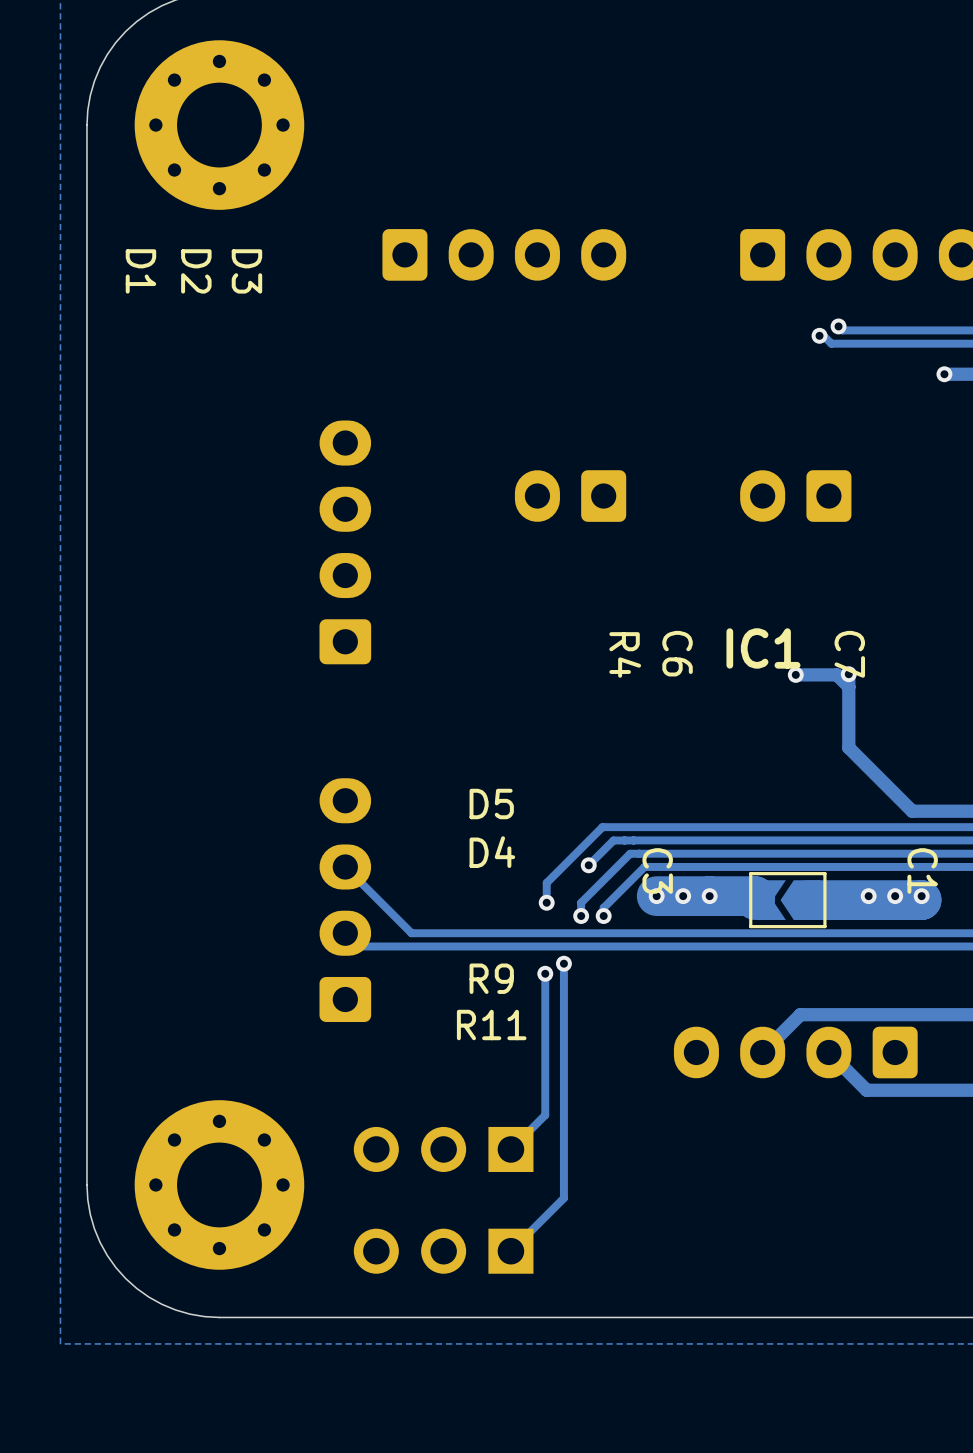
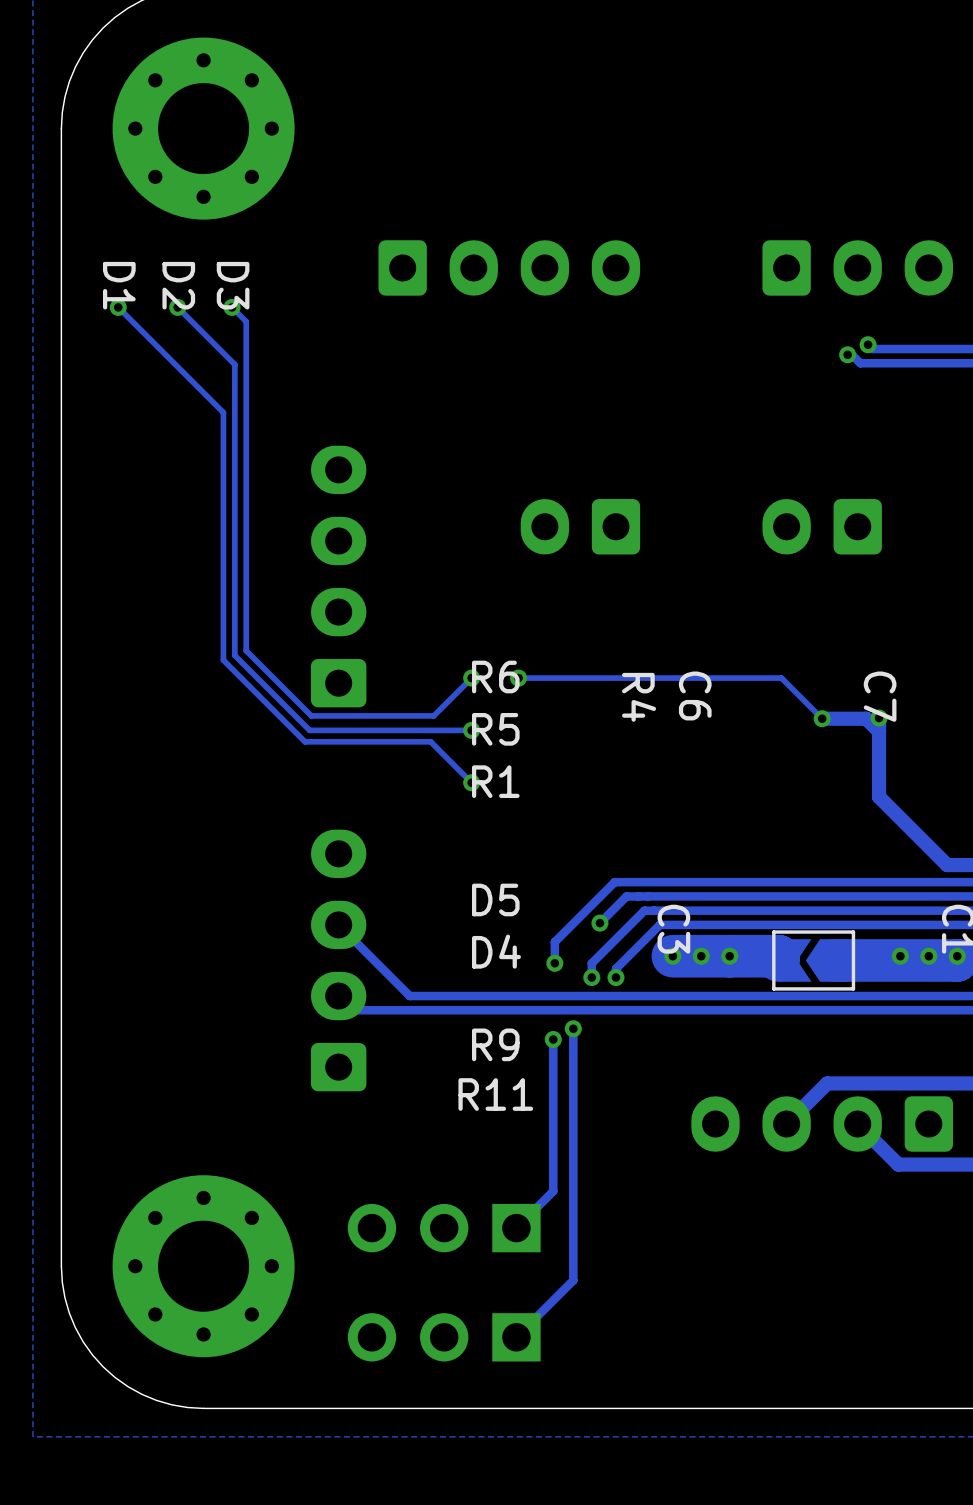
track: none -> (118, 307) (223, 412) (223, 660) (305, 741) (430, 741) (471, 782)
via: none -> (118, 307)
track: none -> (177, 307) (234, 364) (234, 655) (309, 730) (471, 730)
via: none -> (177, 307)
track: none -> (232, 307) (246, 321) (246, 650) (311, 715) (433, 715) (471, 678)
via: none -> (232, 307)
via: none -> (471, 678)
R6: none -> (495, 677)
track: none -> (518, 678) (781, 678) (822, 718)
via: none -> (518, 678)
IC1: (763, 648) -> none
R5: none -> (495, 729)
via: none -> (471, 730)
R1: none -> (495, 781)
via: none -> (471, 782)
D5 position: (491, 804) -> (495, 899)
D4 position: (492, 852) -> (496, 951)

